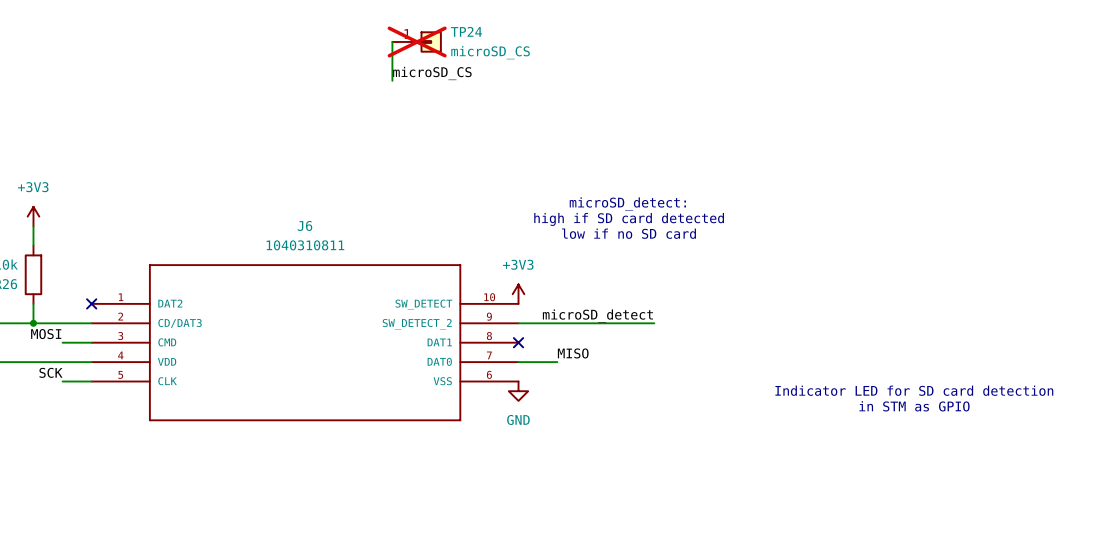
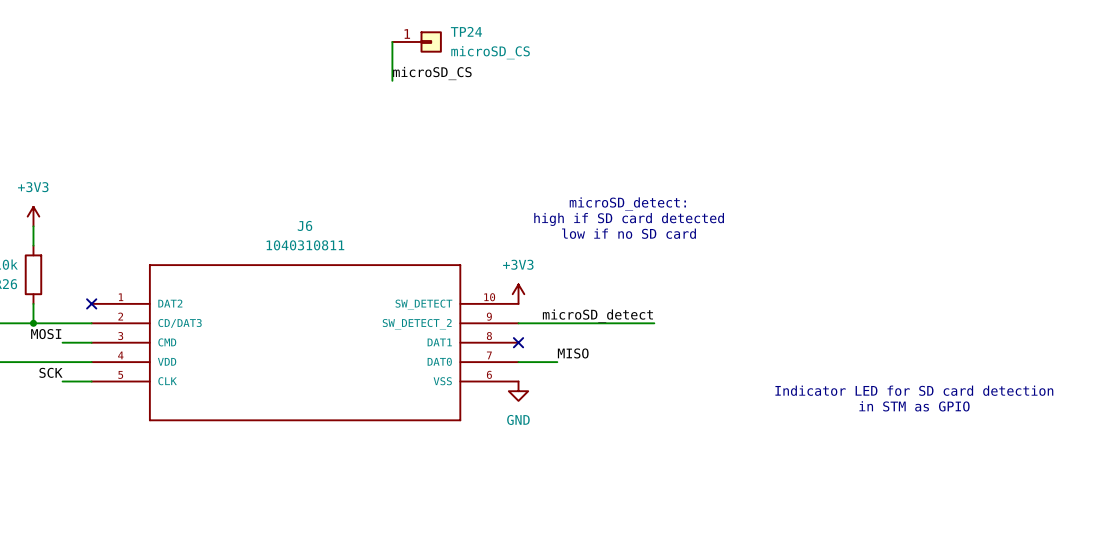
TP24 do-not-place cross: (417, 41) -> none

